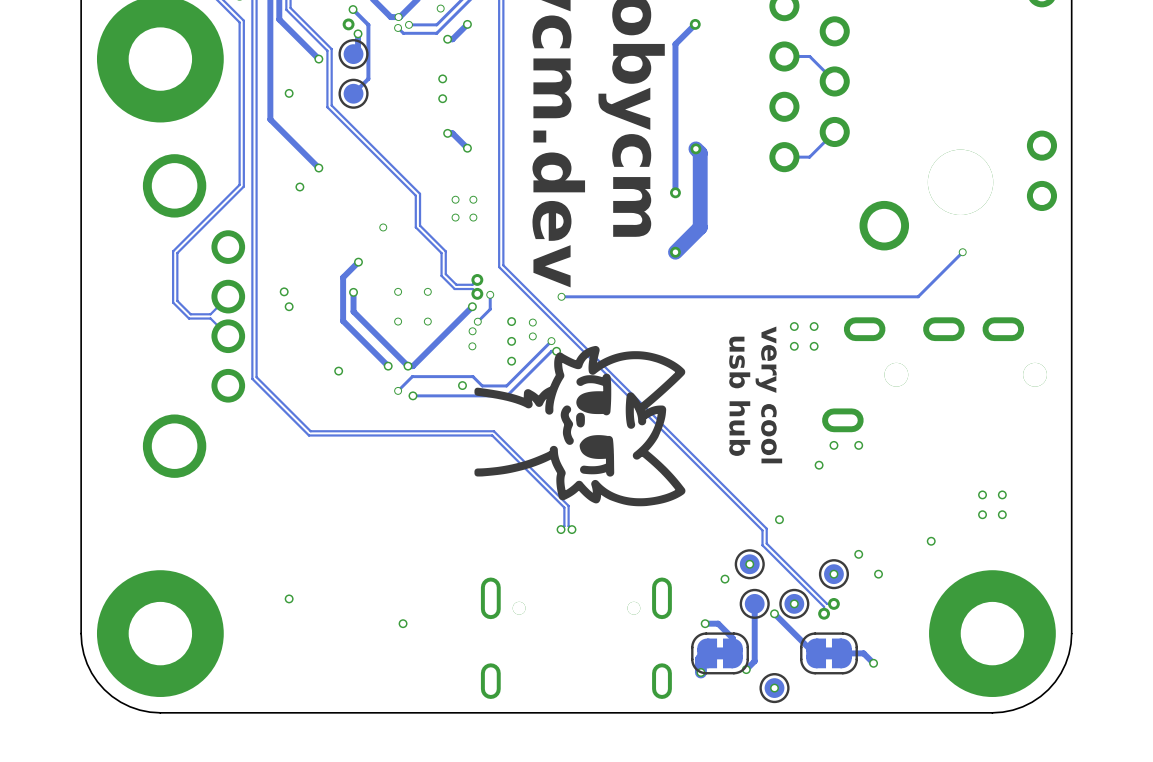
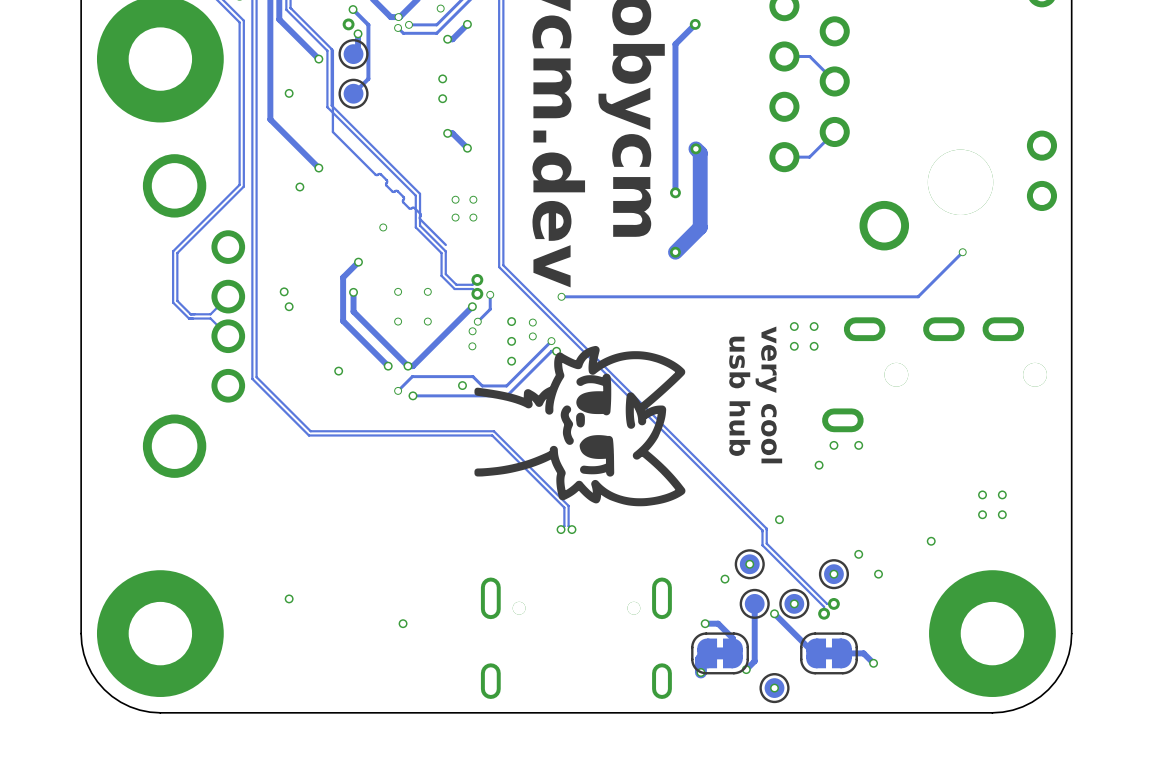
track: none -> (332, 50) (332, 132) (375, 174) (380, 174) (386, 180) (386, 185) (392, 191) (397, 191) (403, 196) (403, 202) (409, 208) (414, 207) (420, 213) (420, 219) (445, 244)

